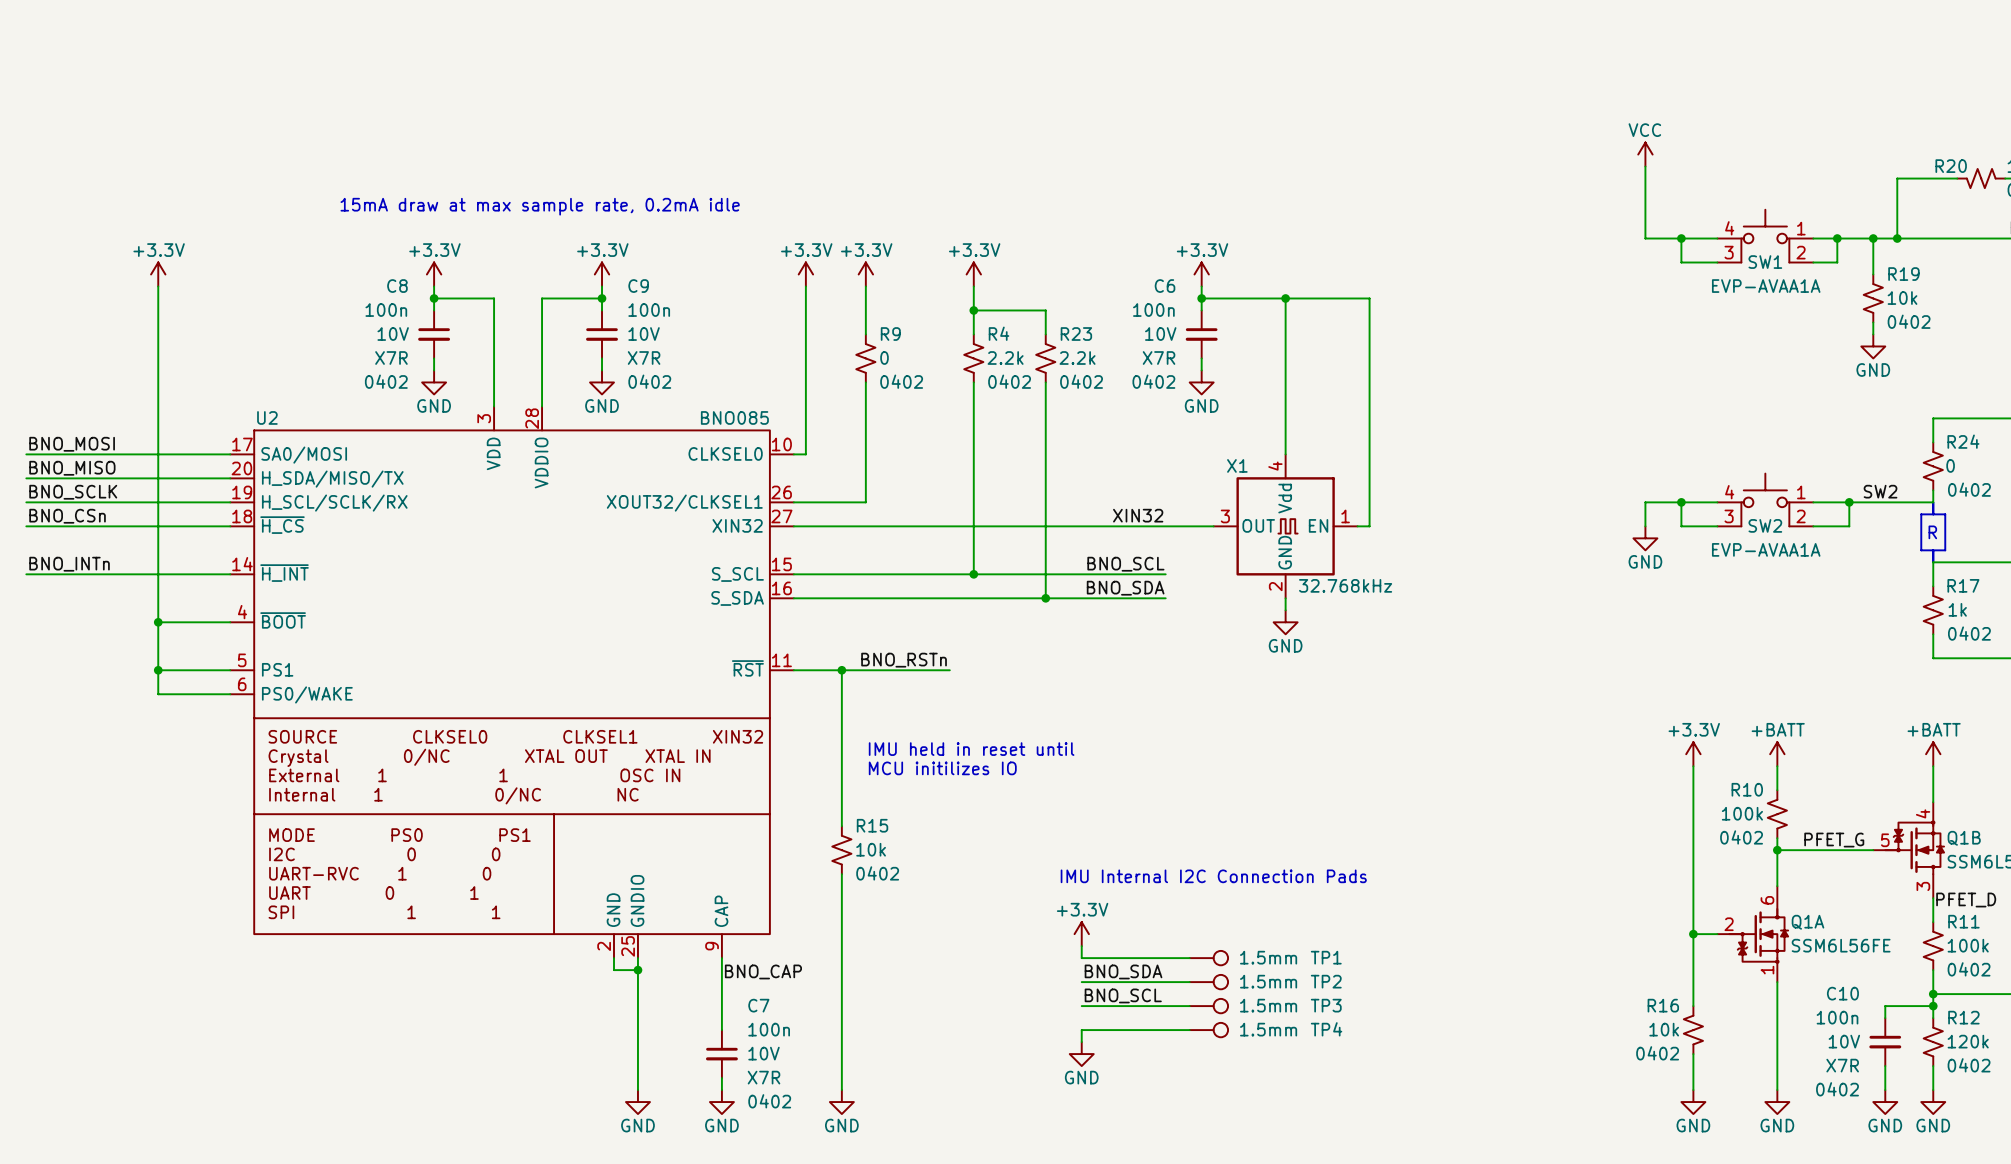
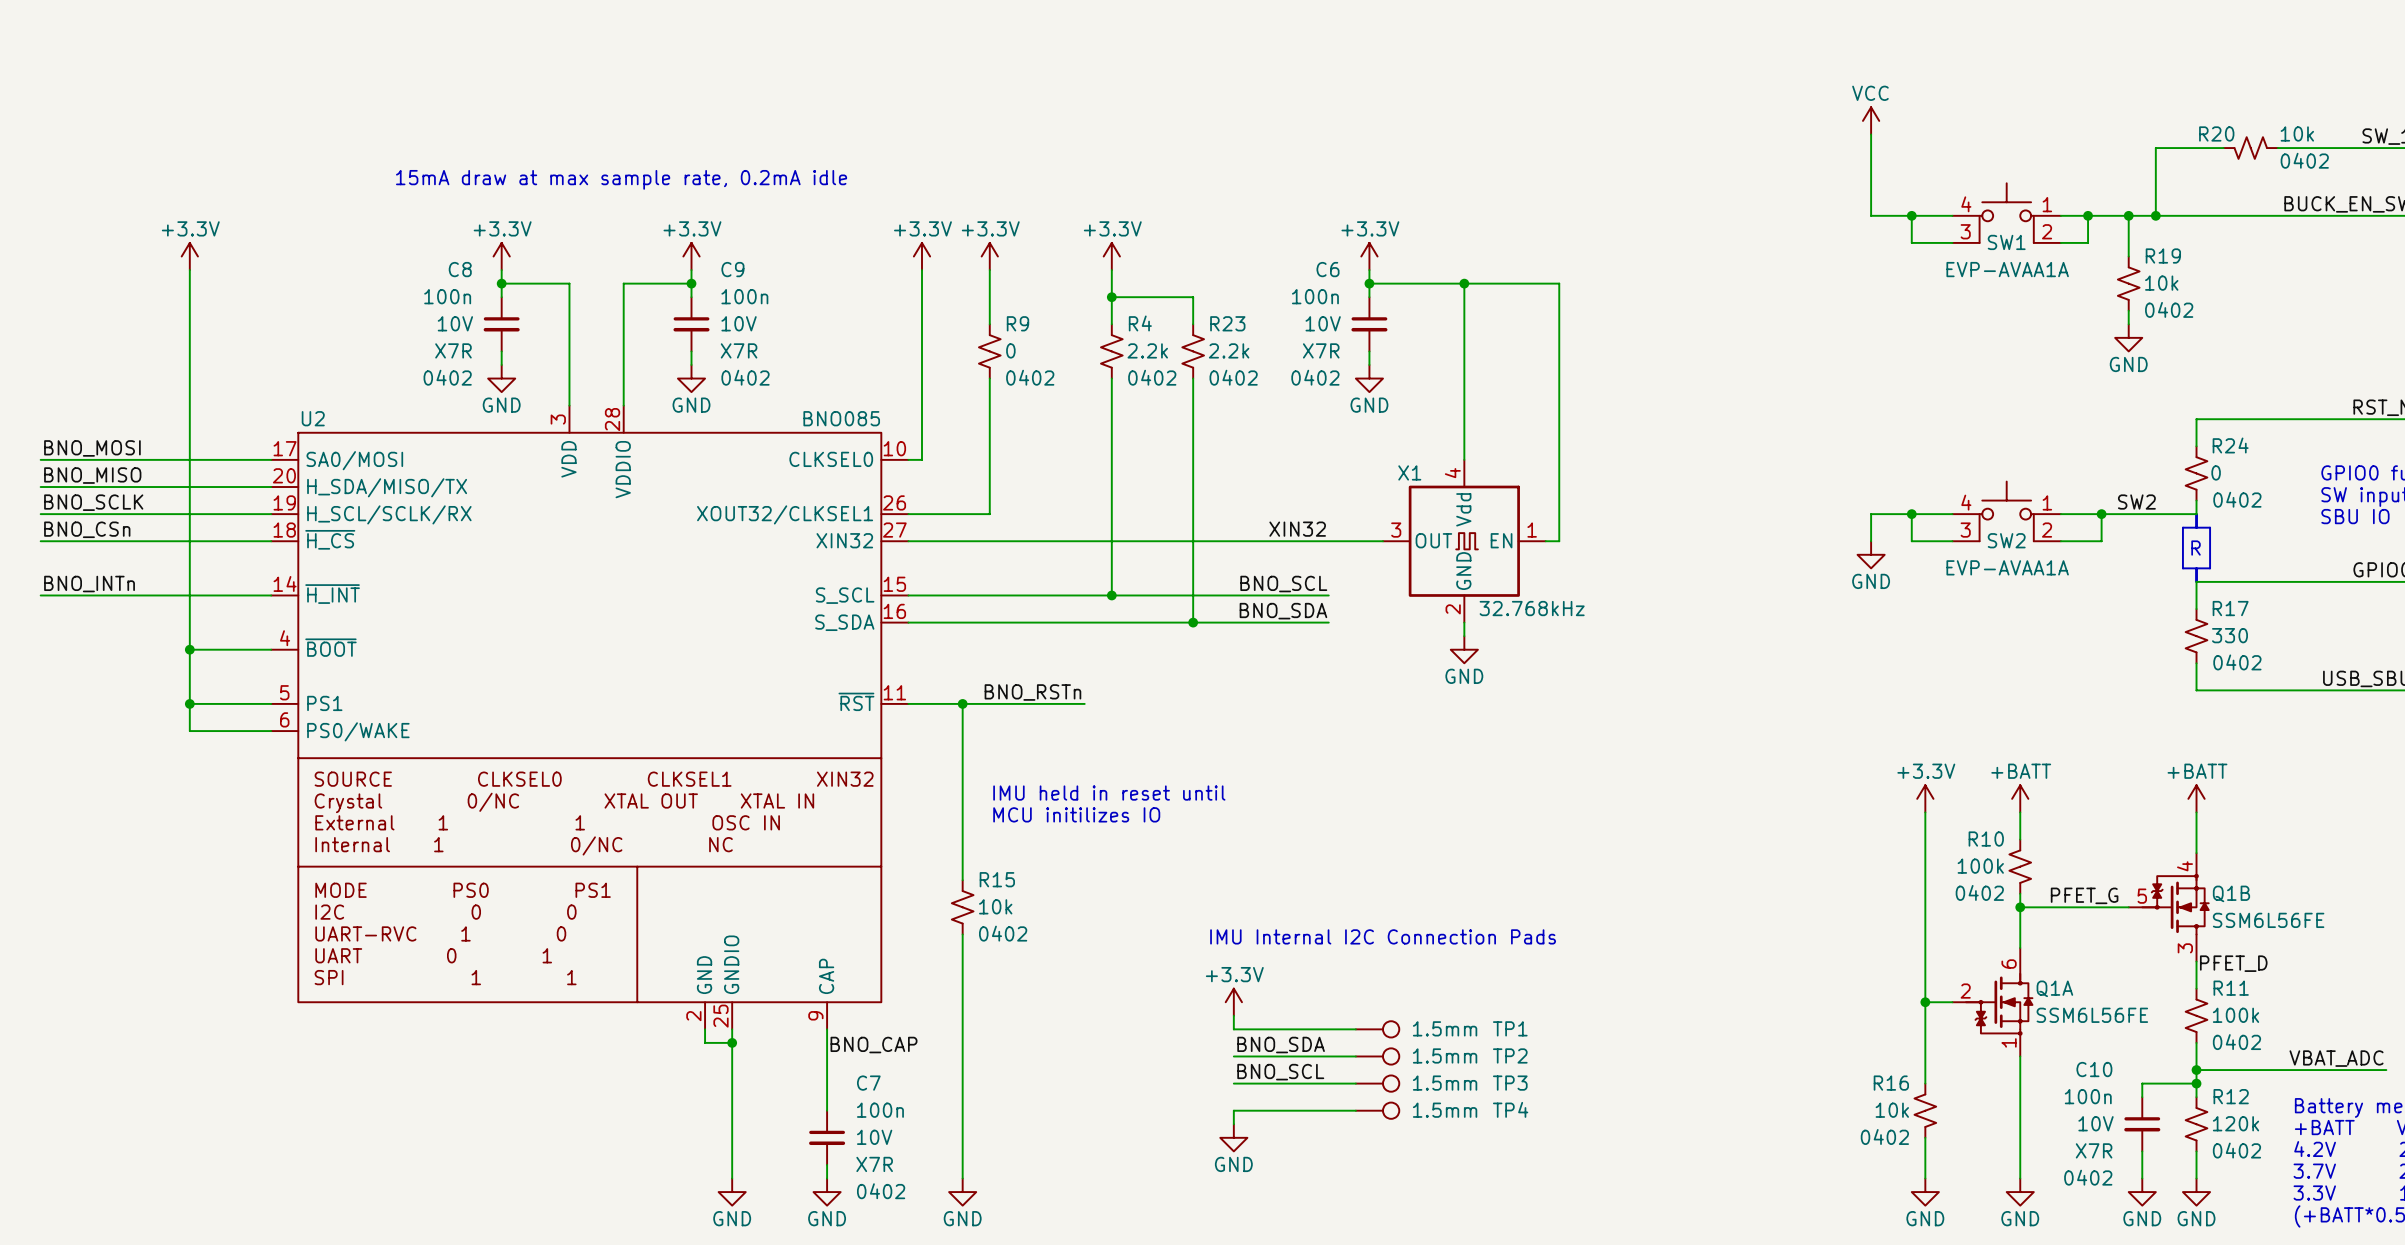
R17 value: 1k (1957, 609) -> 330 (2229, 635)

